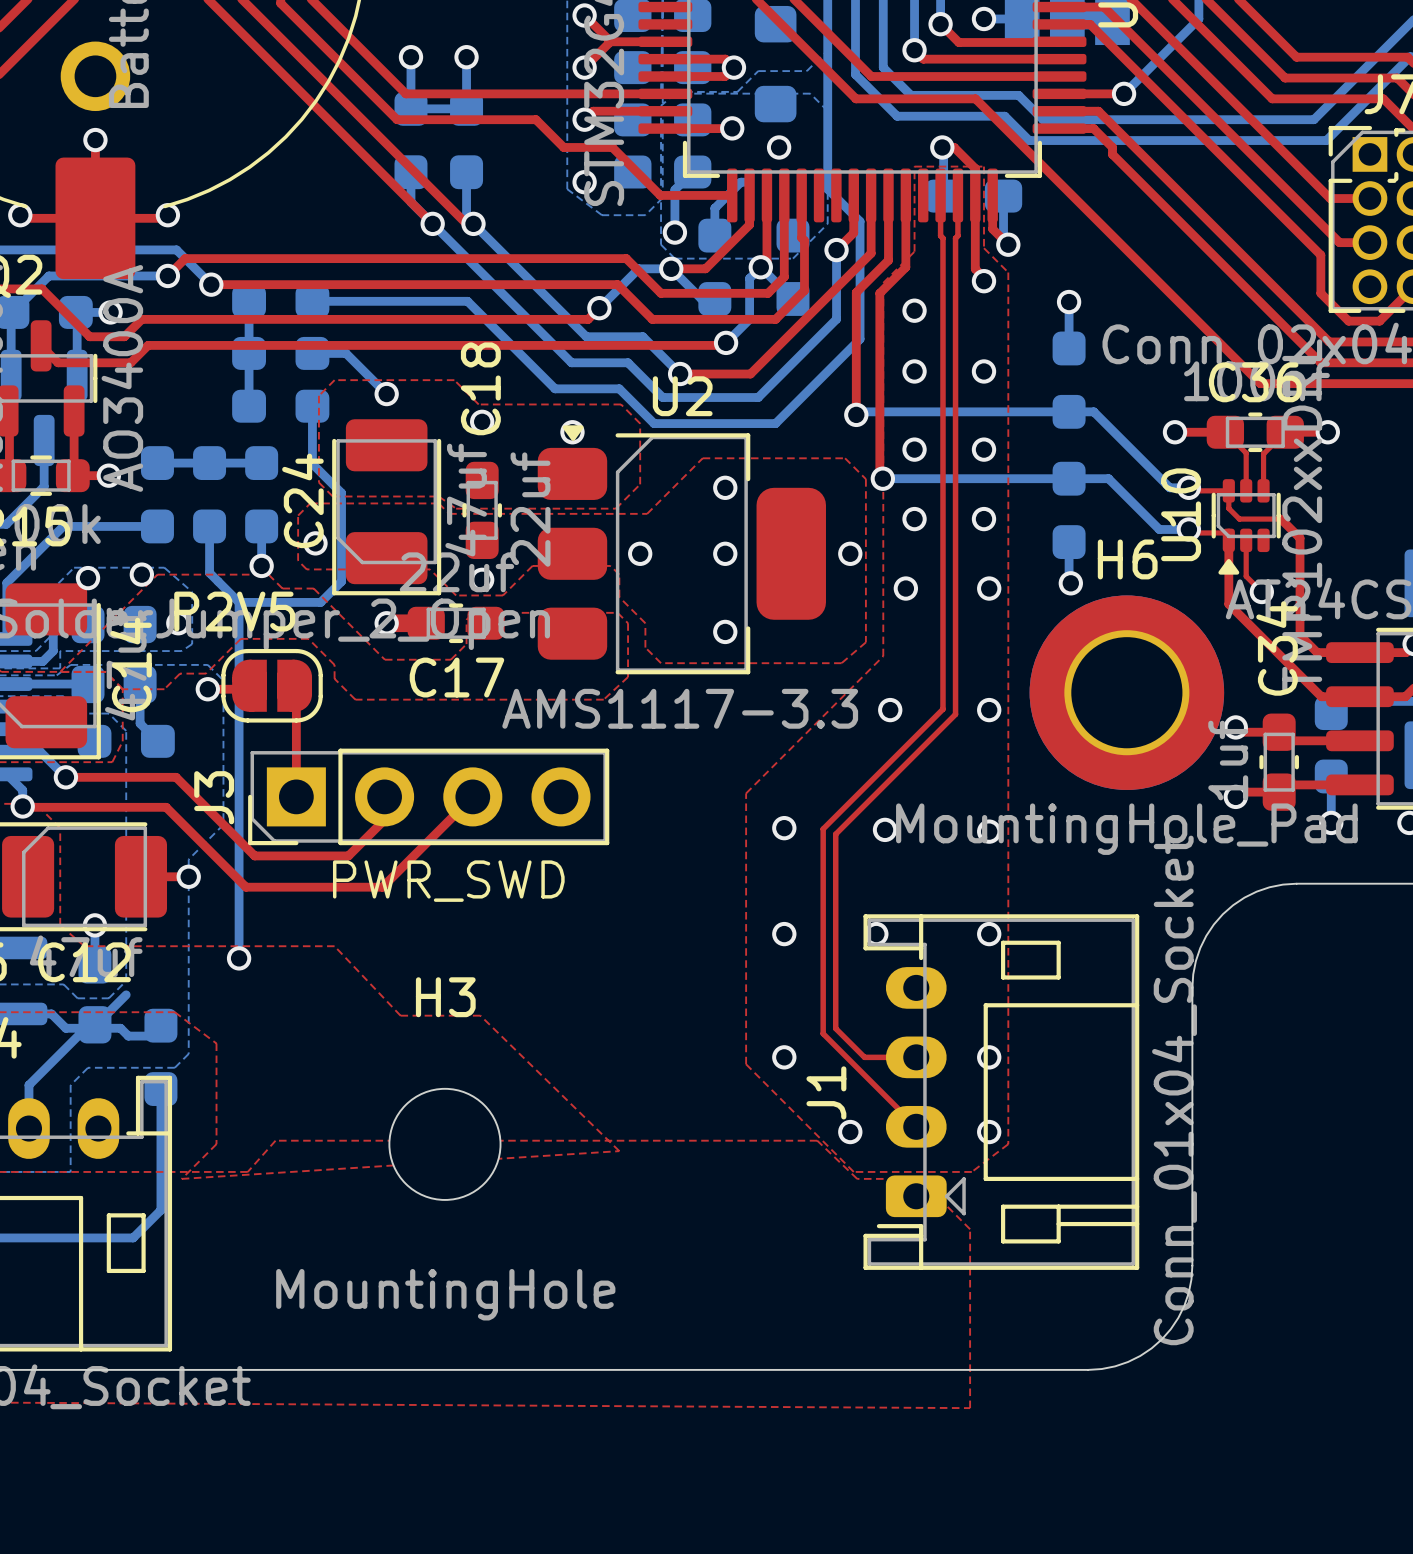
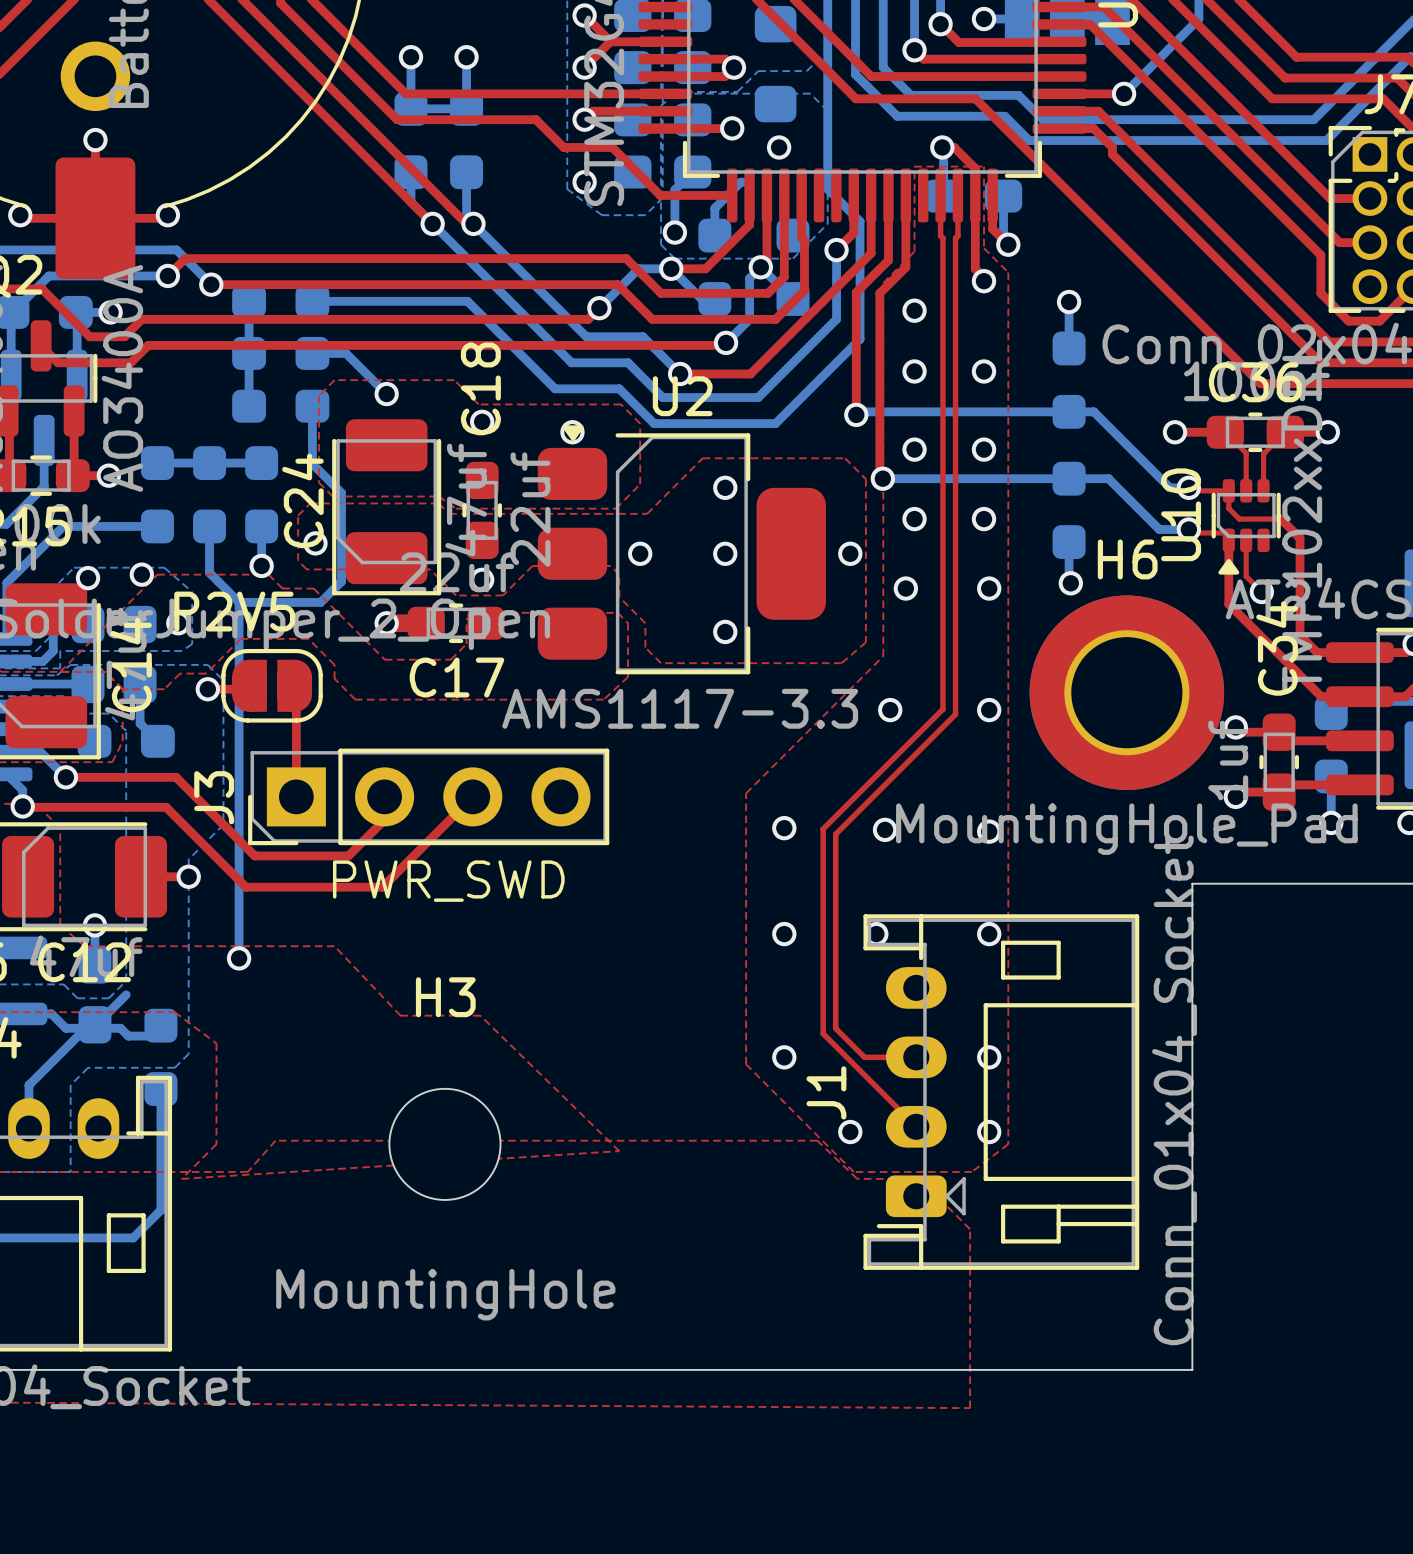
board edge: (1296, 883) (1269, 887) (1256, 891) (1244, 897) (1222, 914) (1206, 935) (1200, 948) (1193, 974) (1192, 987) -> (1296, 883) (1192, 883) (1192, 987)
board edge: (1192, 1265) (1188, 1292) (1184, 1305) (1178, 1317) (1161, 1339) (1140, 1355) (1128, 1361) (1115, 1366) (1088, 1369) -> (1192, 1265) (1192, 1369) (1088, 1369)

